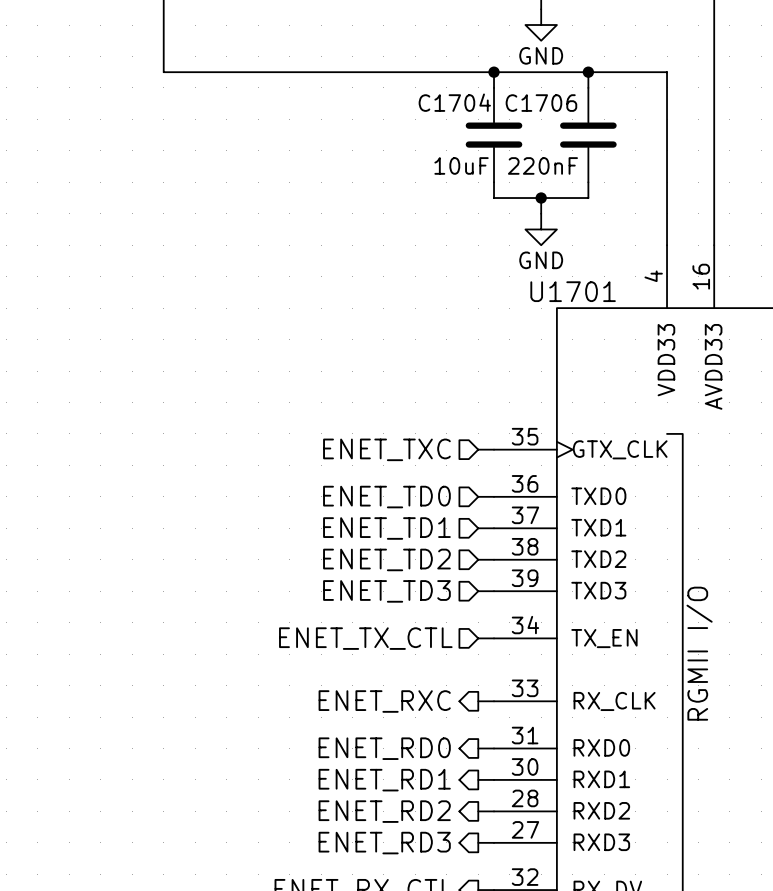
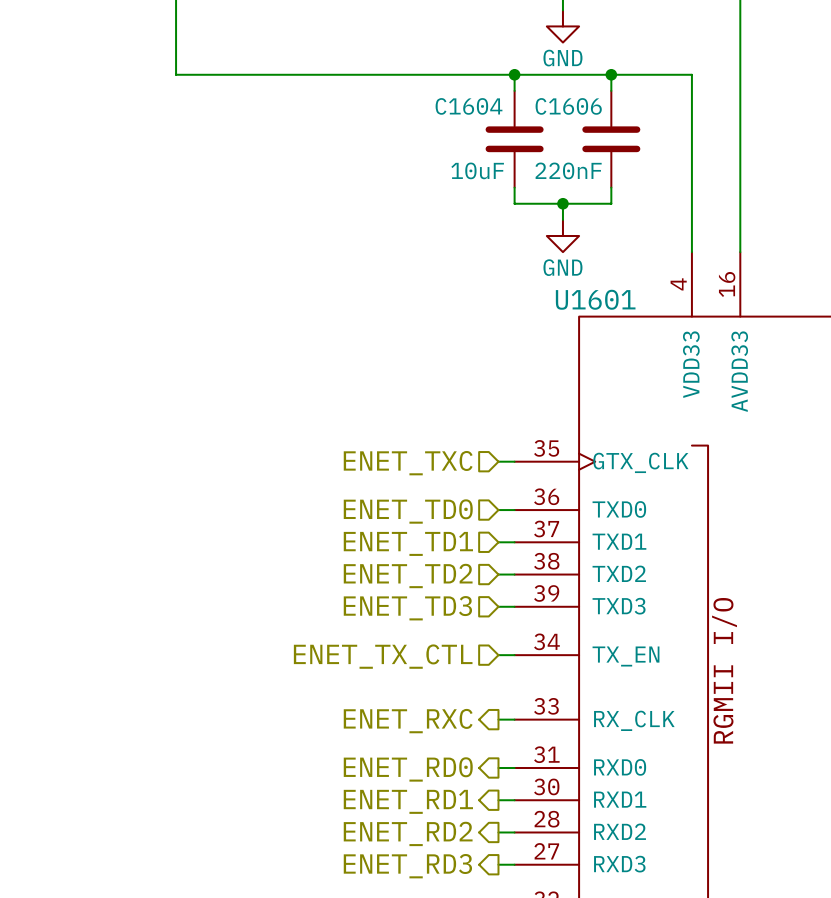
C1704 name: C1704 (454, 102) -> C1604 (469, 106)
C1706 name: C1706 (541, 103) -> C1606 (568, 106)
U1701 name: U1701 (573, 291) -> U1601 (595, 299)

